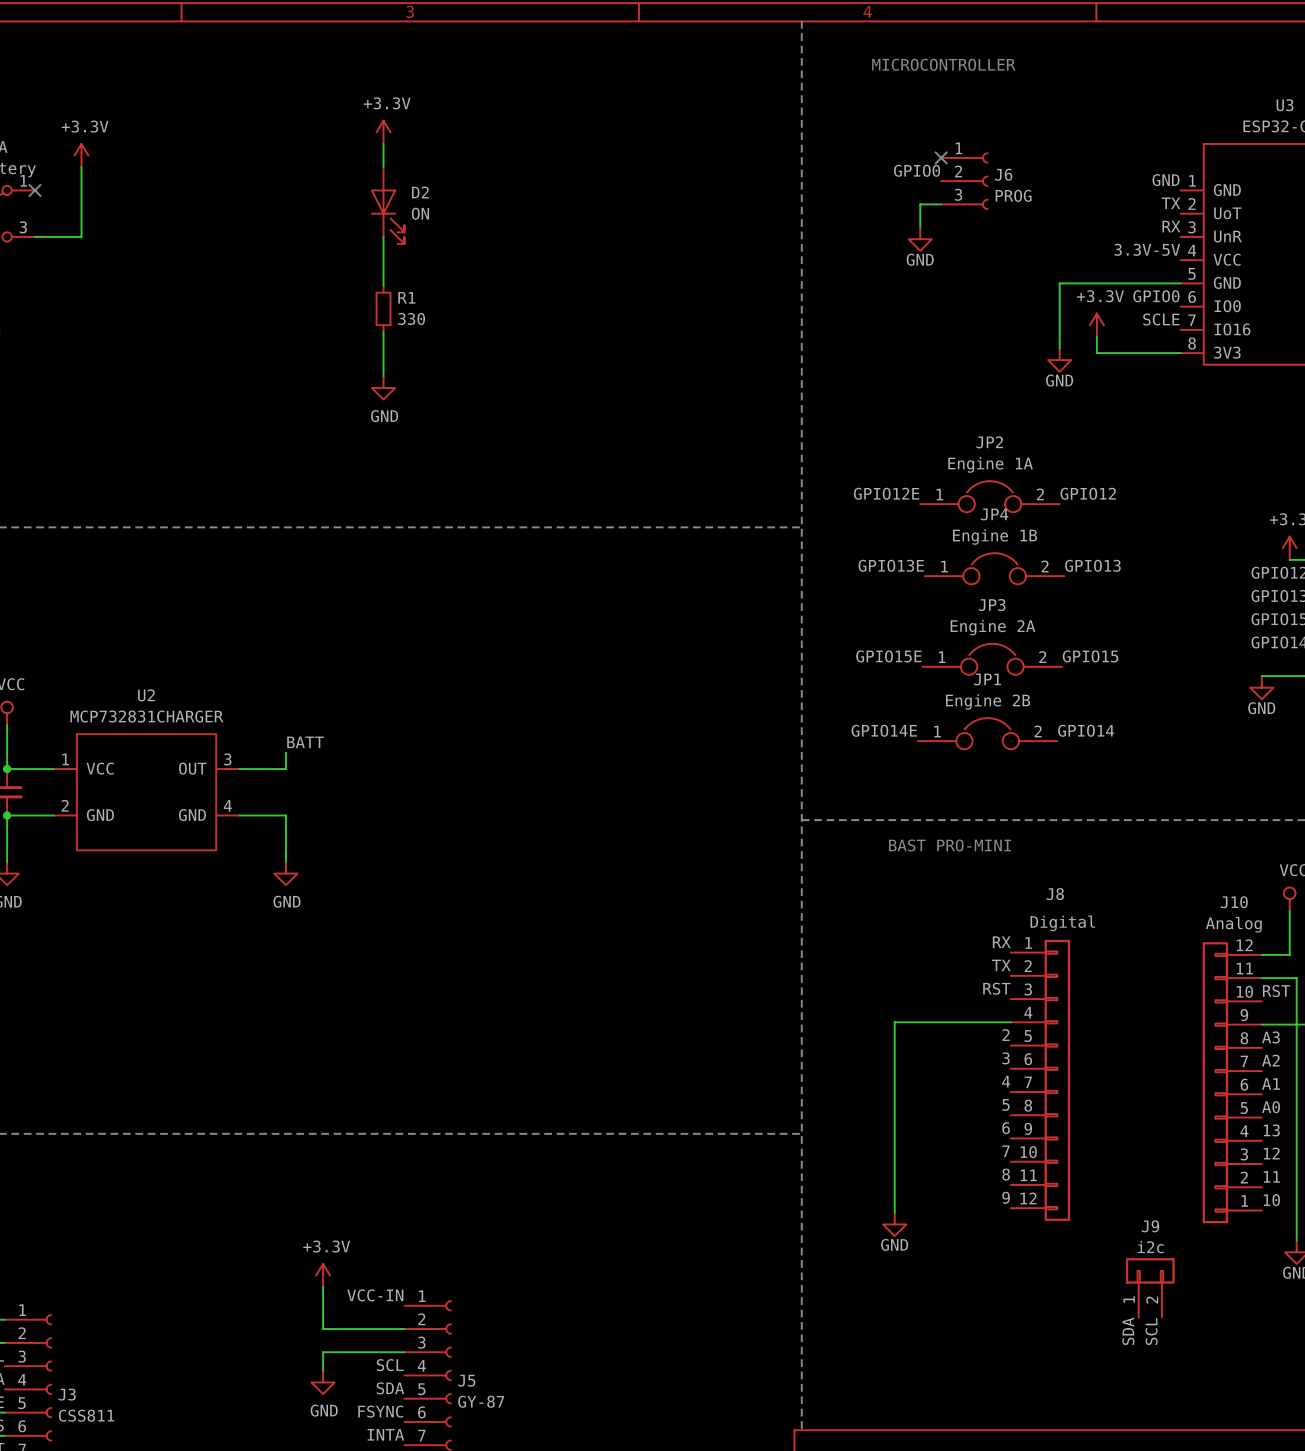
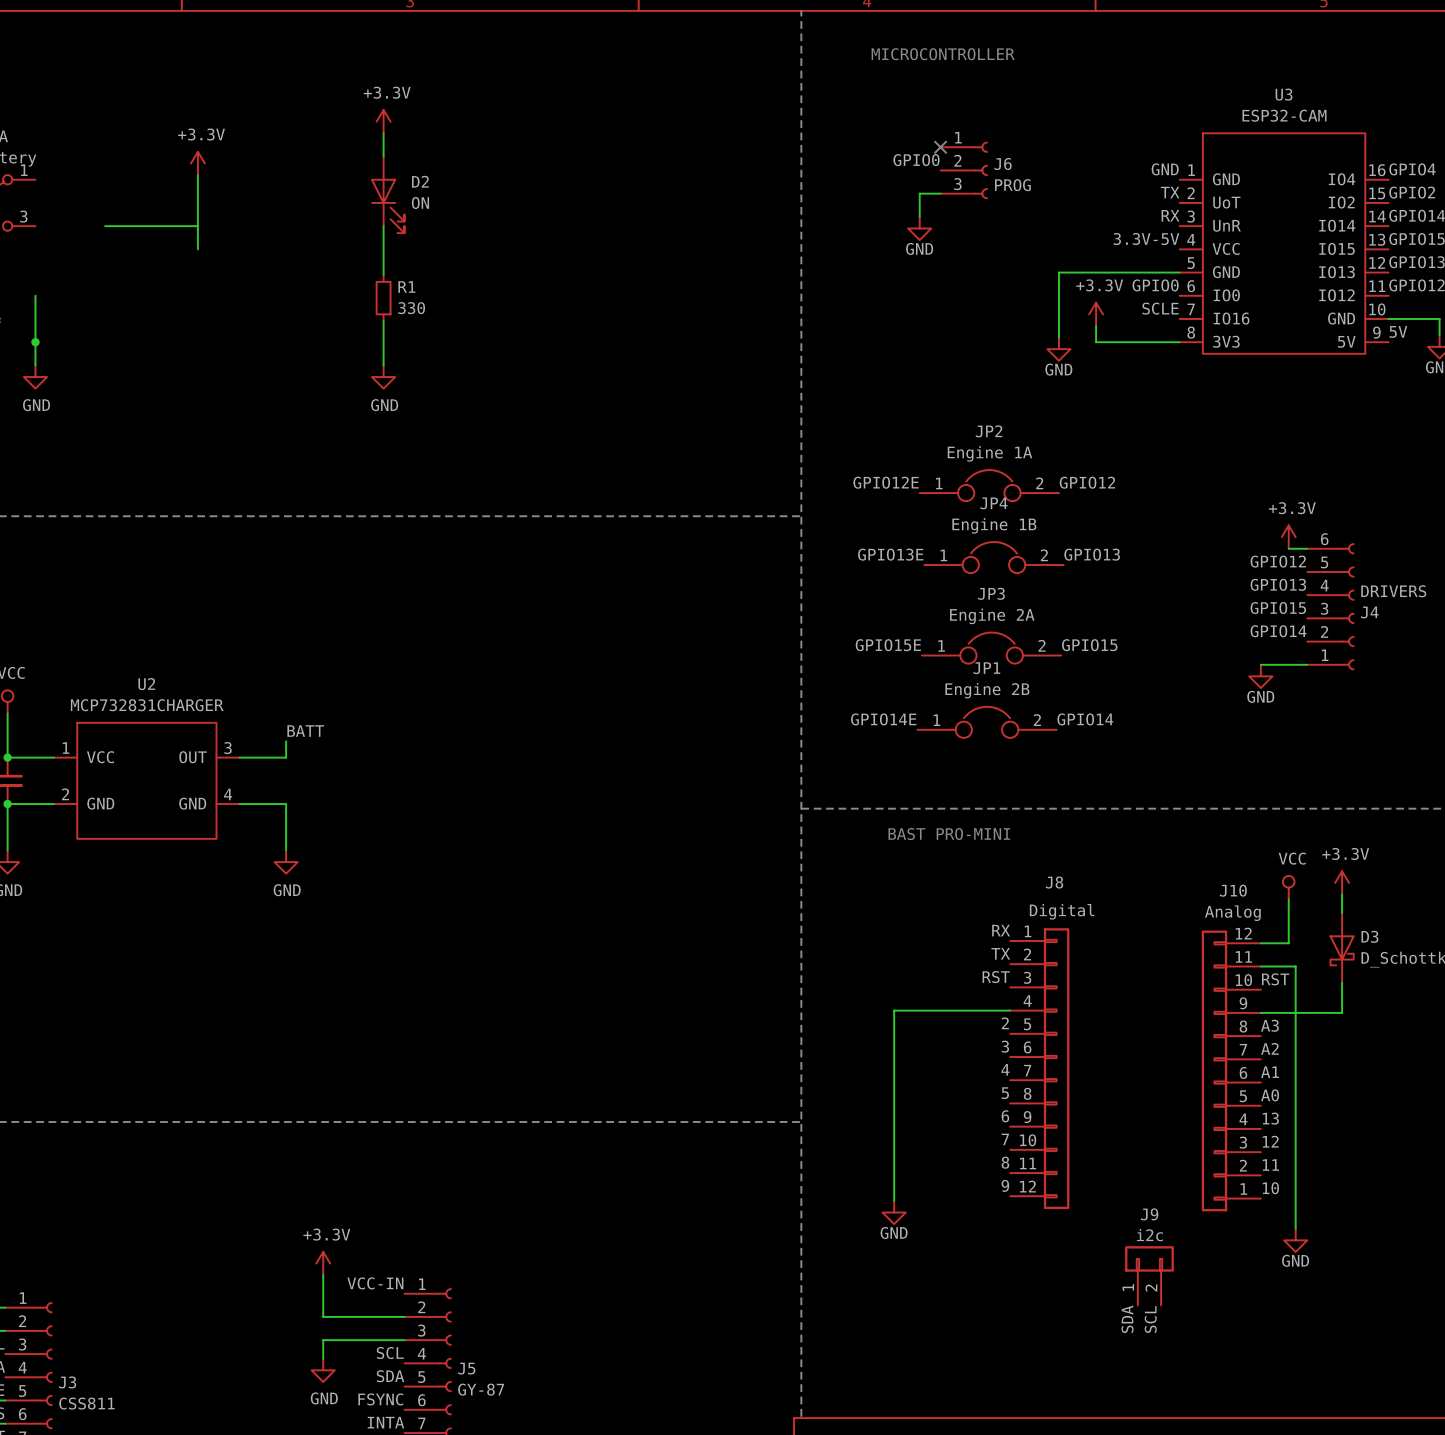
power symbol position: +3.3V (81, 155) -> +3.3V (197, 163)
wire: (81, 167) (81, 236) (35, 236) -> none
wire: none -> (197, 175) (197, 249)
no-connect mark: (35, 190) -> none
wire: none -> (105, 226) (197, 226)
wire: none -> (35, 295) (35, 365)
junction: none -> (35, 342)
power symbol: none -> GND (35, 377)

